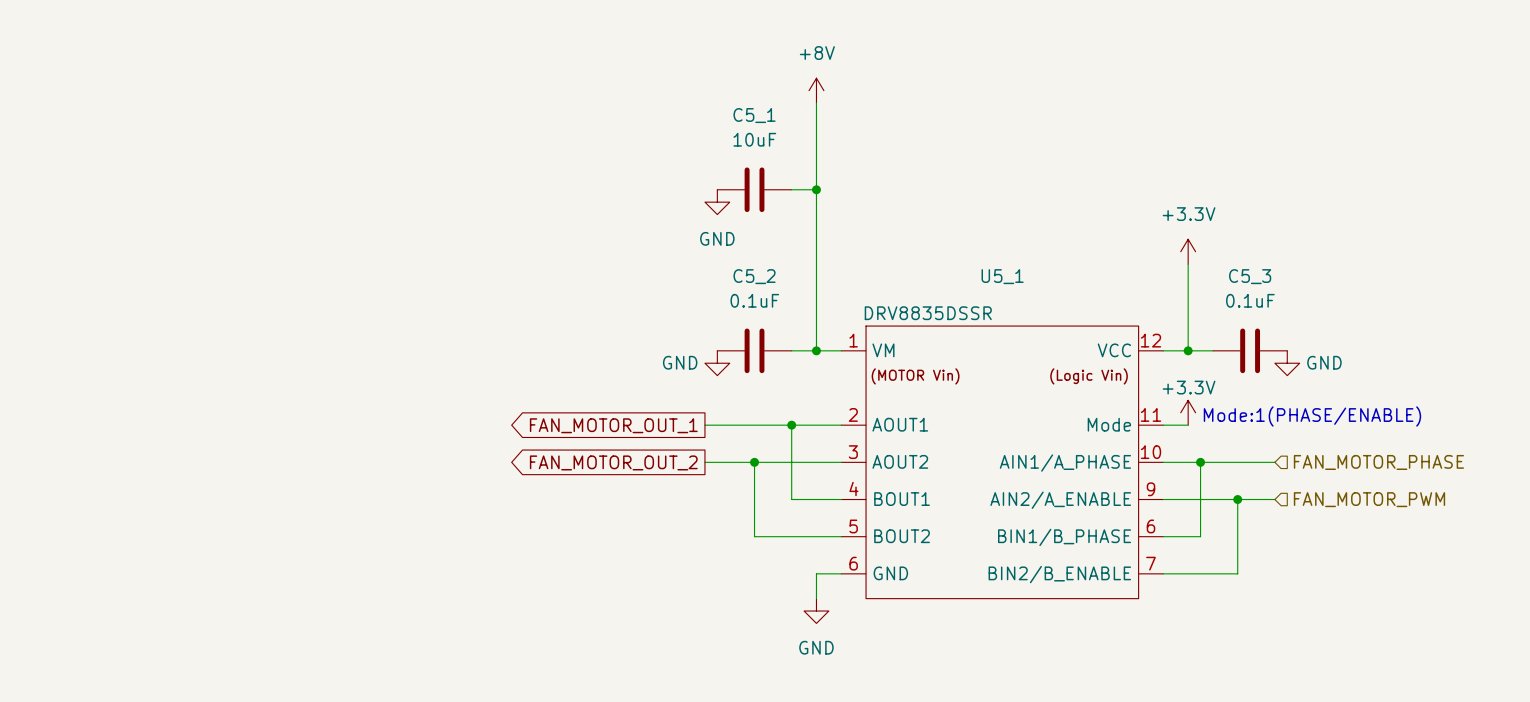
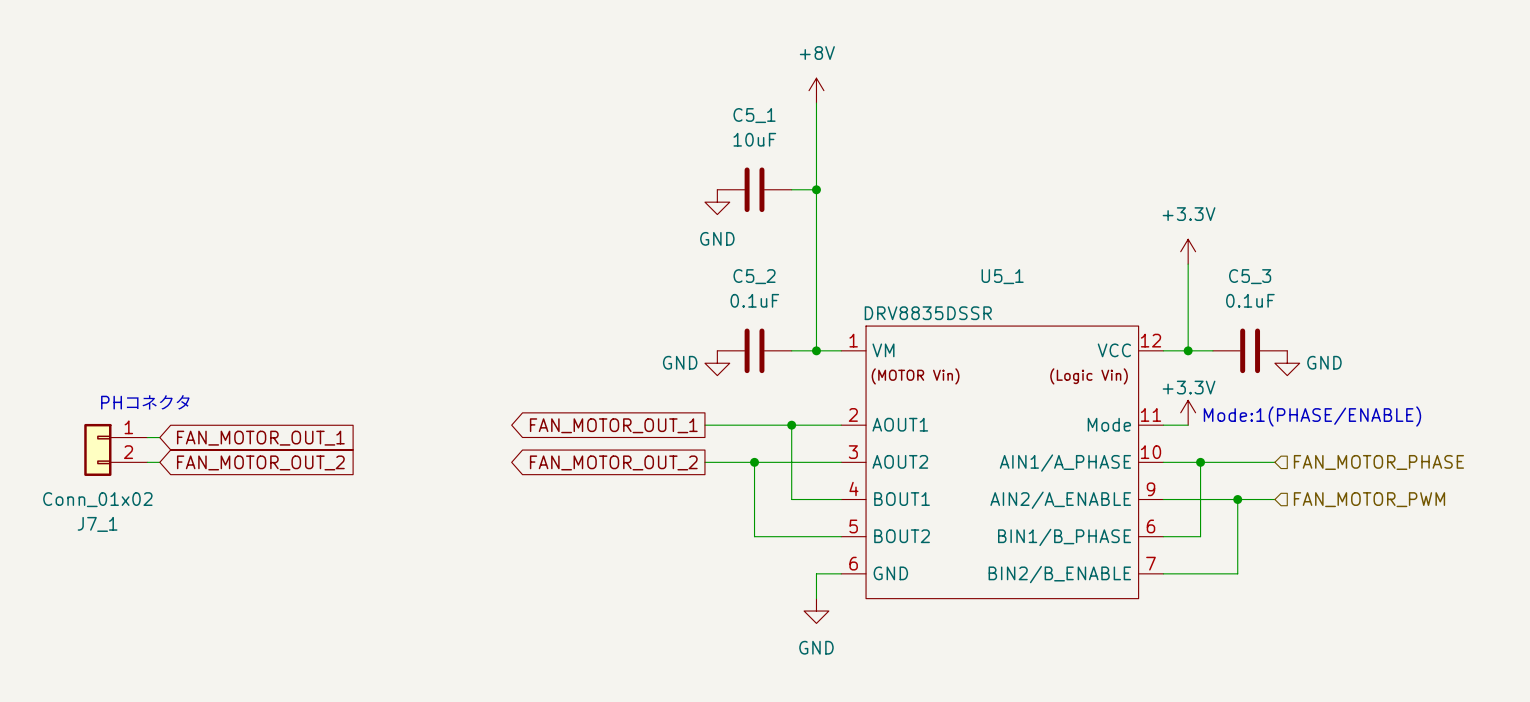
text: none -> PHコネクタ (145, 402)
wire: none -> (147, 437) (159, 437)
global label: none -> FAN_MOTOR_OUT_1 (260, 438)
J7_1: none -> Conn_01x02 (115, 449)
wire: none -> (147, 462) (159, 462)
global label: none -> FAN_MOTOR_OUT_2 (260, 462)

